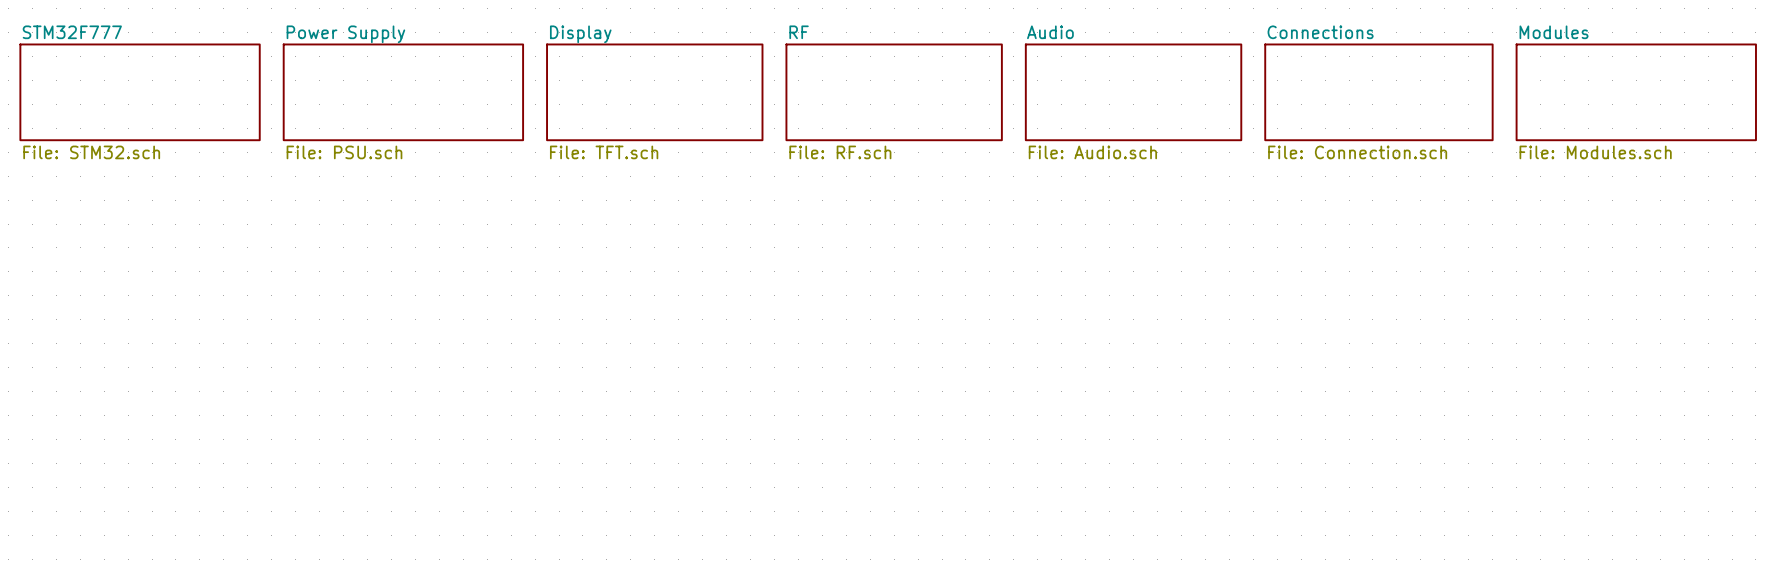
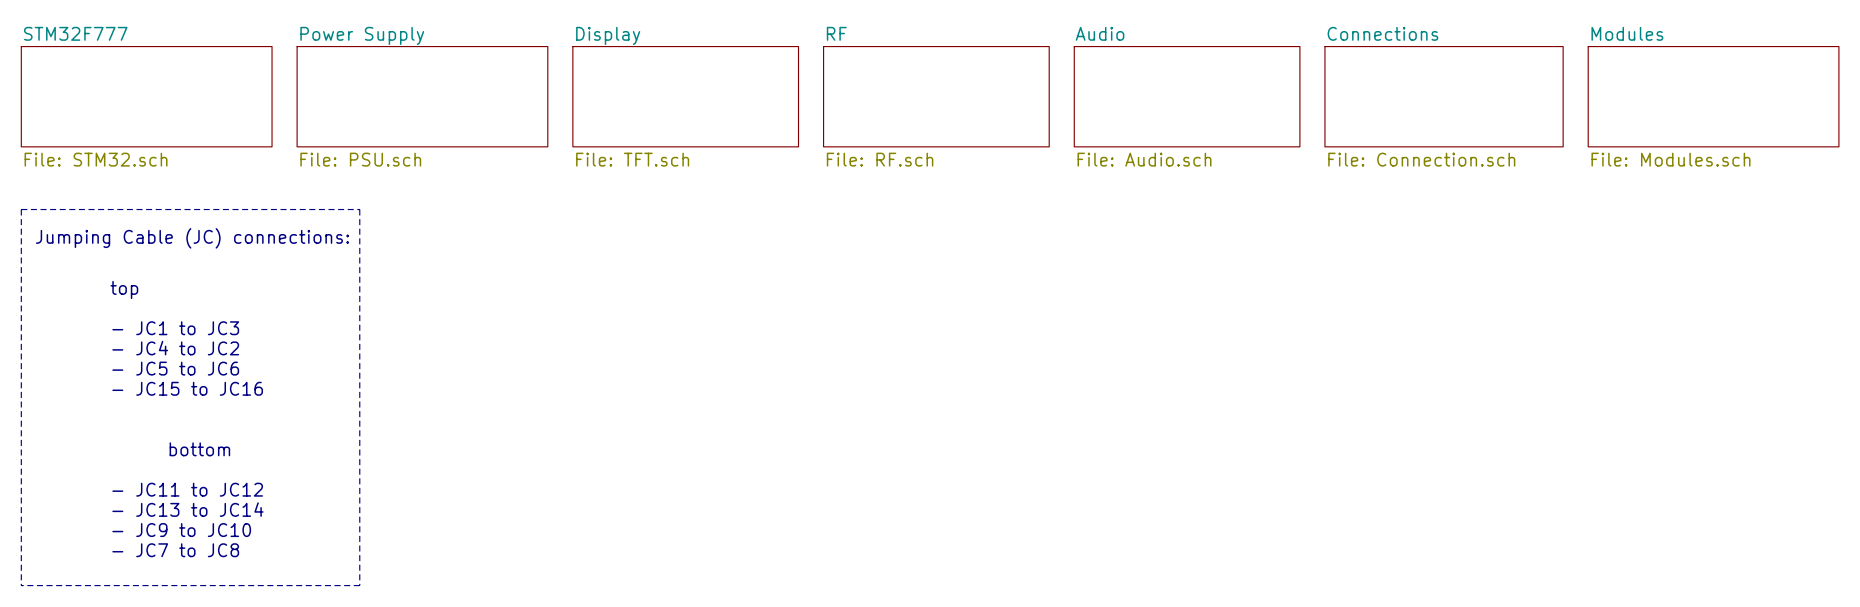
line: none -> (21, 209) (359, 209) (359, 585) (21, 585) (21, 209)
text: none -> Jumping Cable (JC) connections: (192, 238)
text: none -> top (124, 289)
text: none -> - JC1 to JC3 (175, 328)
text: none -> - JC4 to JC2 (175, 348)
text: none -> - JC5 to JC6 (175, 368)
text: none -> - JC15 to JC16 (187, 388)
text: none -> bottom (199, 449)
text: none -> - JC11 to JC12 (187, 489)
text: none -> - JC13 to JC14 (187, 509)
text: none -> - JC9 to JC10 (181, 530)
text: none -> - JC7 to JC8 (175, 550)

